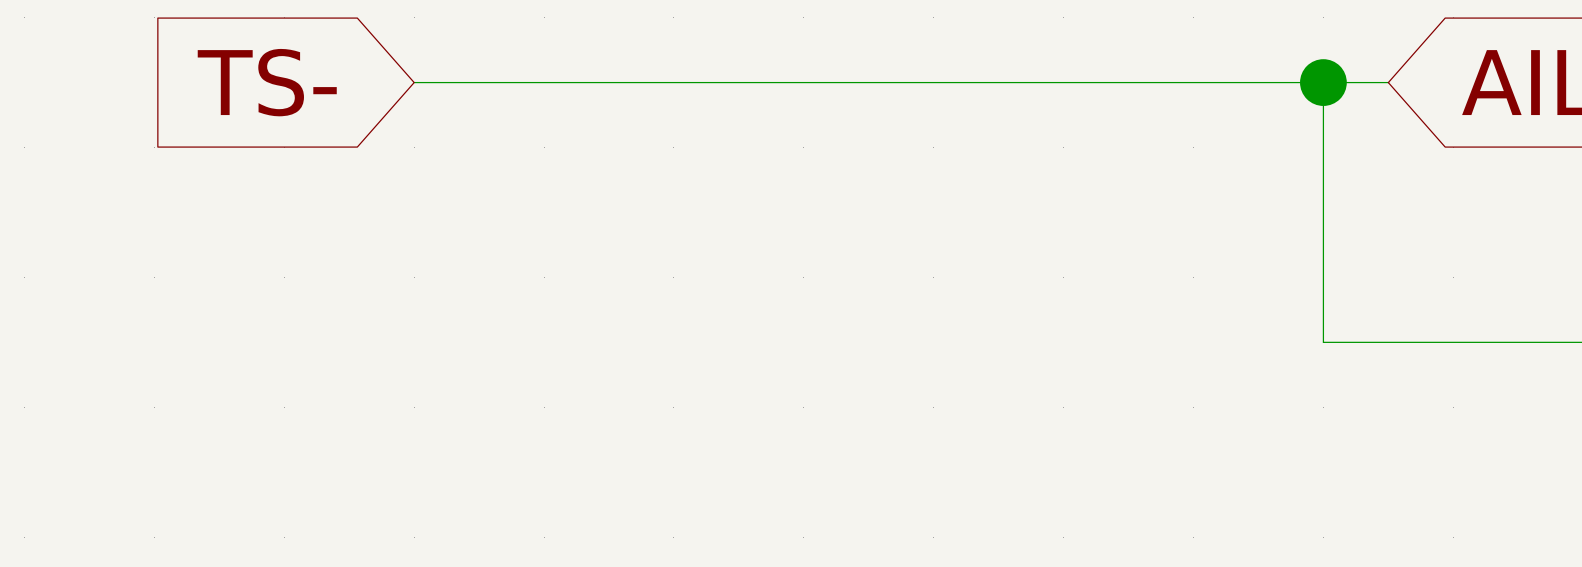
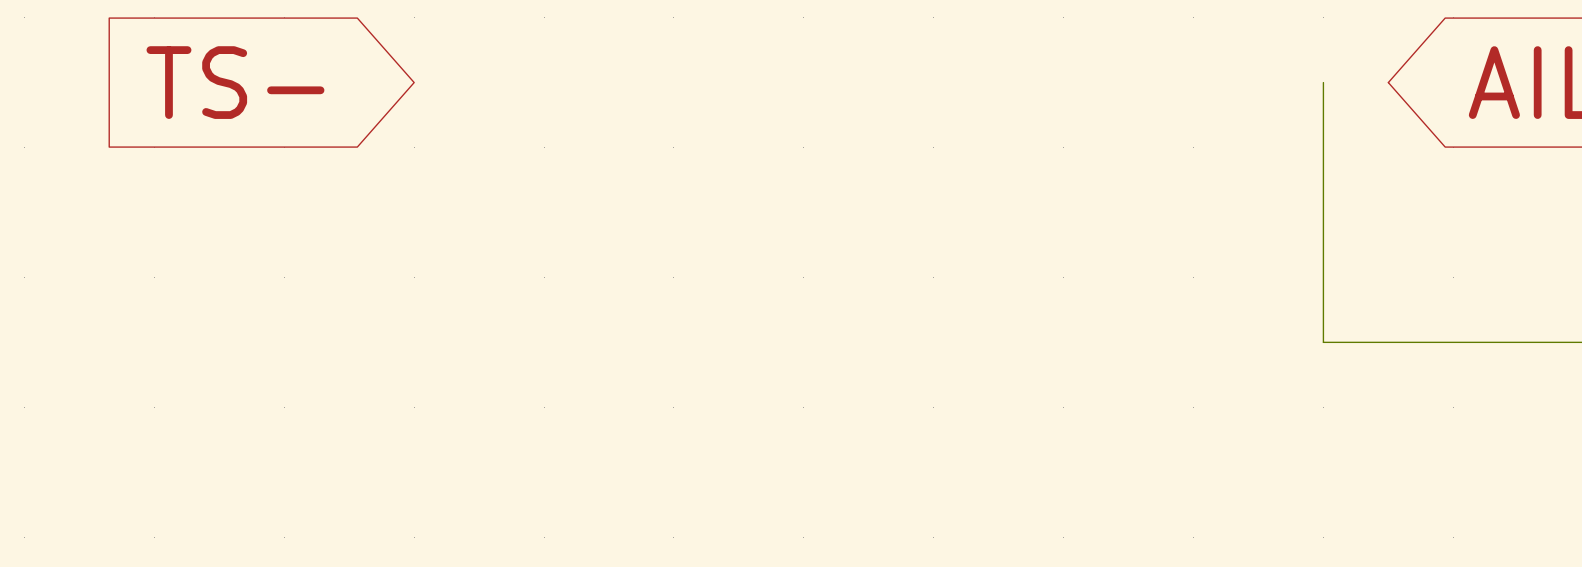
wire: (414, 82) (1388, 82) -> none
junction: (1323, 82) -> none

